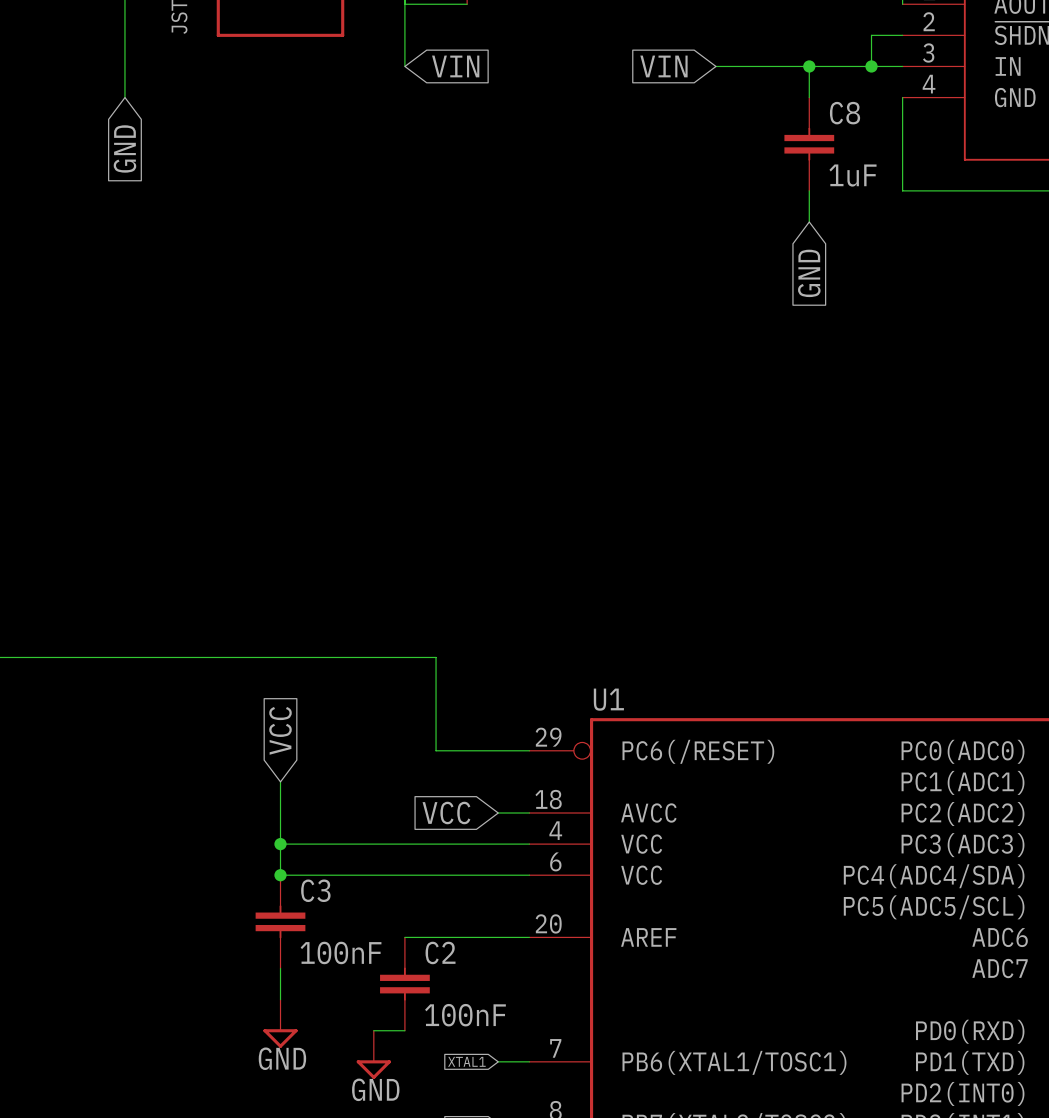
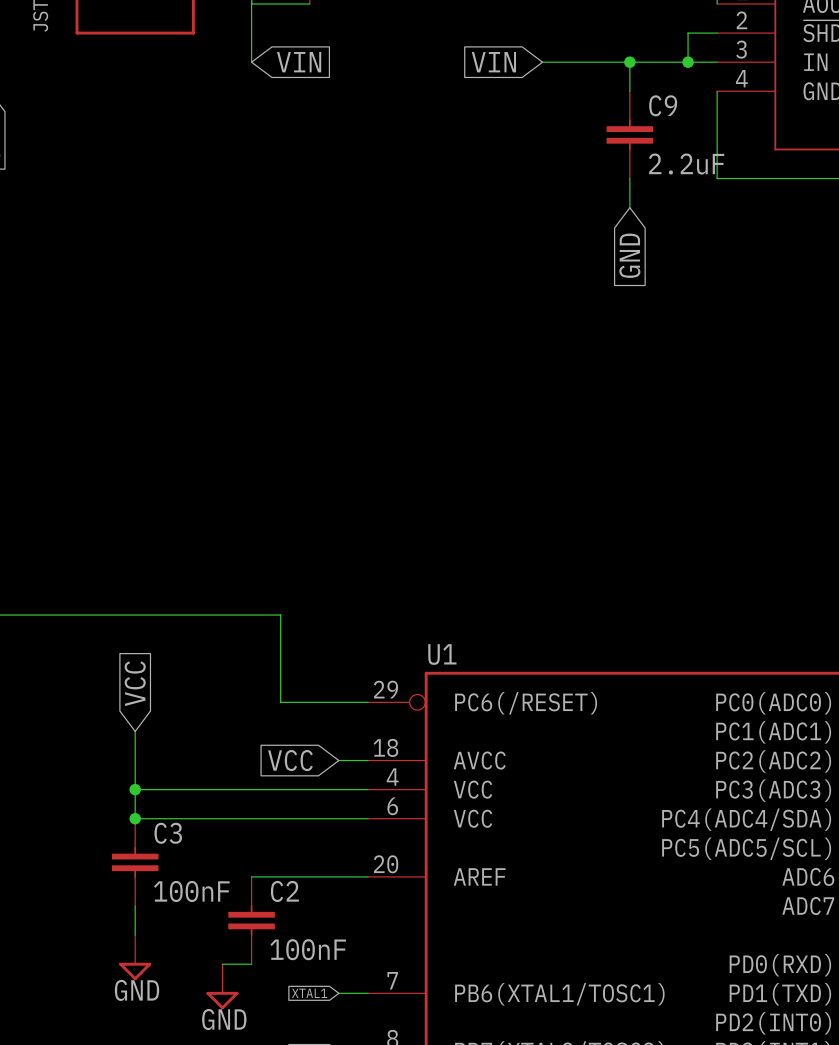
C8 name: C8 (845, 113) -> C9 (663, 105)
C8 value: 1uF (852, 175) -> 2.2uF (686, 164)

